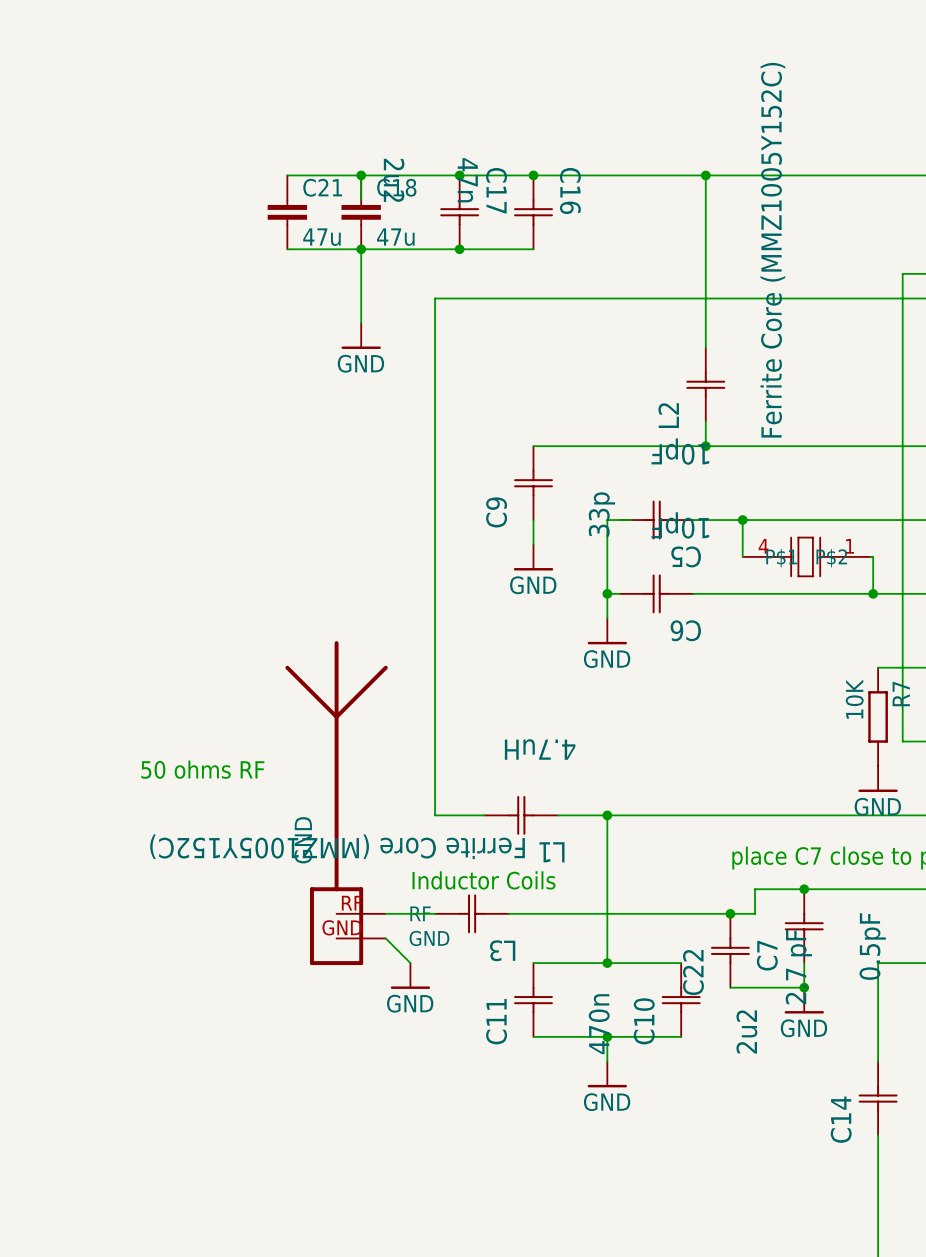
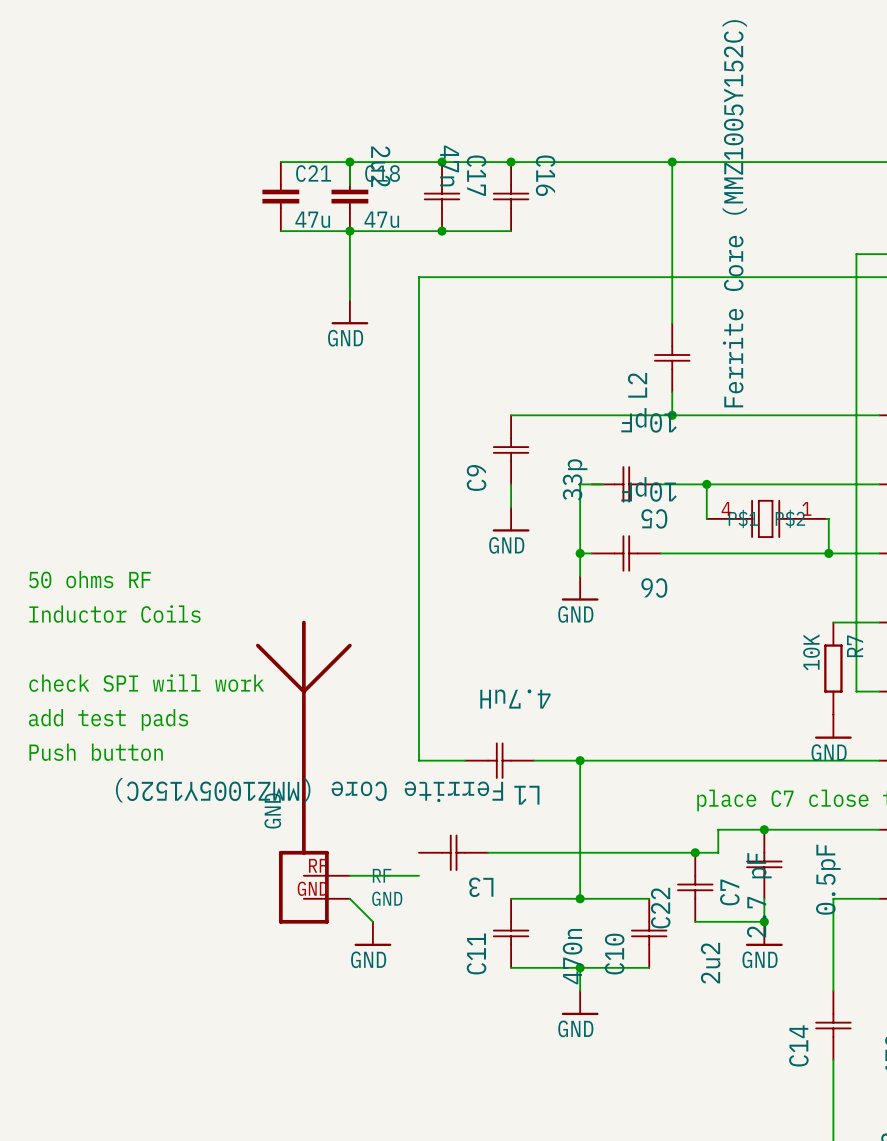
text: none -> Inductor Coils (114, 614)
text: none -> check SPI will work (146, 683)
text position: 50 ohms RF (202, 769) -> 50 ohms RF (89, 579)
text: none -> add test pads (108, 719)
GND position: (336, 803) -> (303, 772)
text: none -> Push button (96, 752)
text: Inductor Coils (483, 880) -> none
wire: (385, 913) (435, 913) -> none
wire: none -> (349, 875) (418, 875)
wire: (385, 938) (410, 963) -> (349, 898) (372, 921)
power symbol position: GND (410, 975) -> GND (372, 933)

